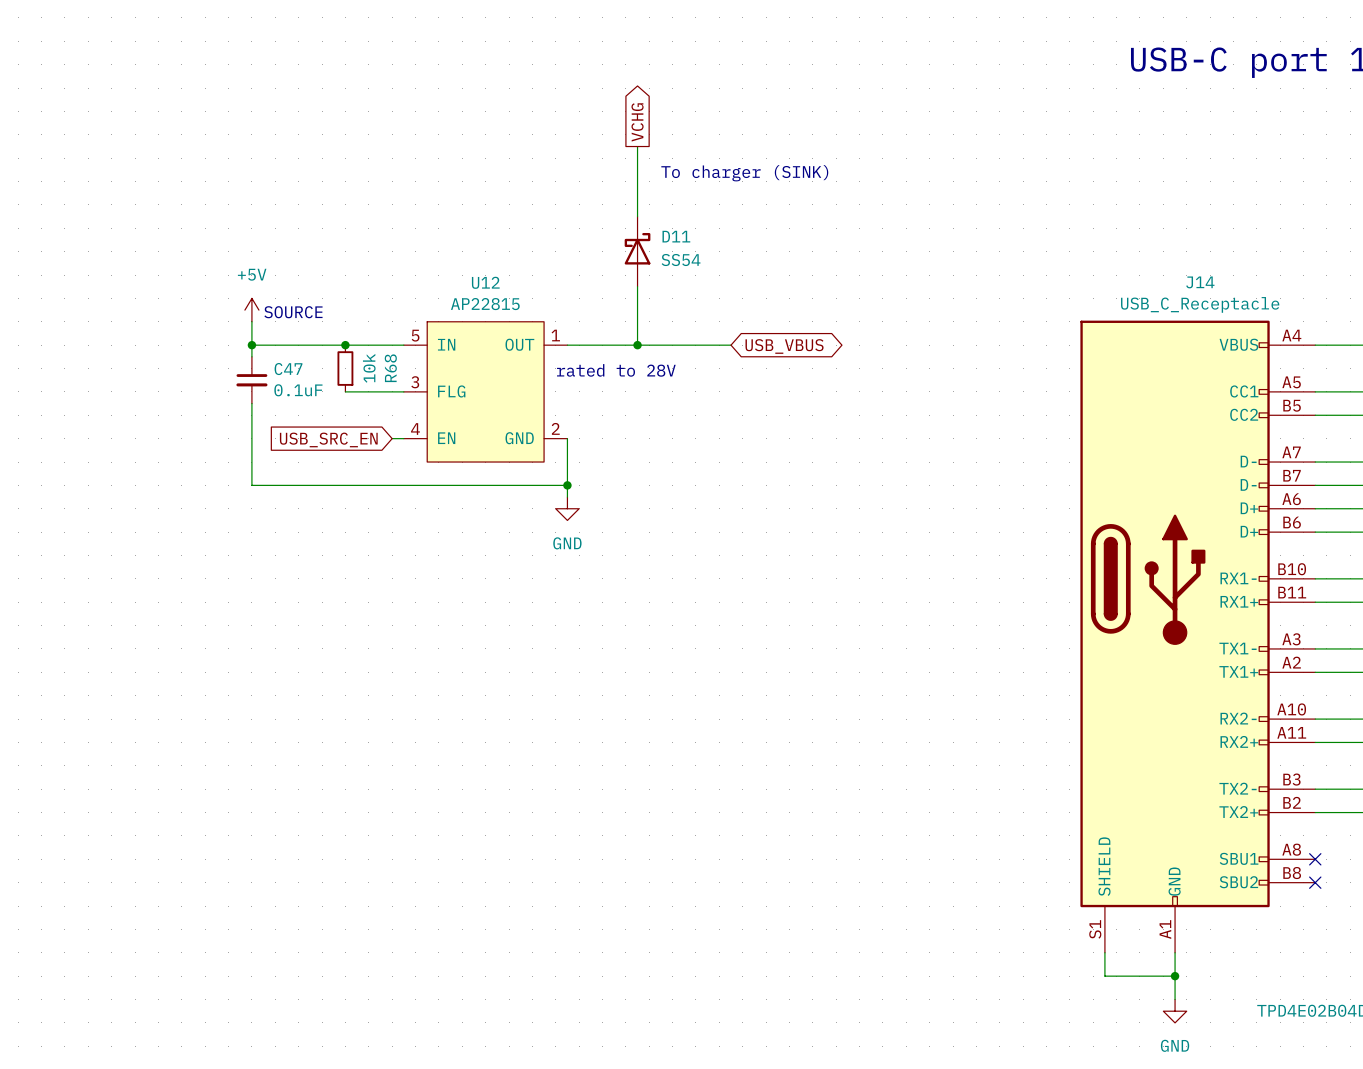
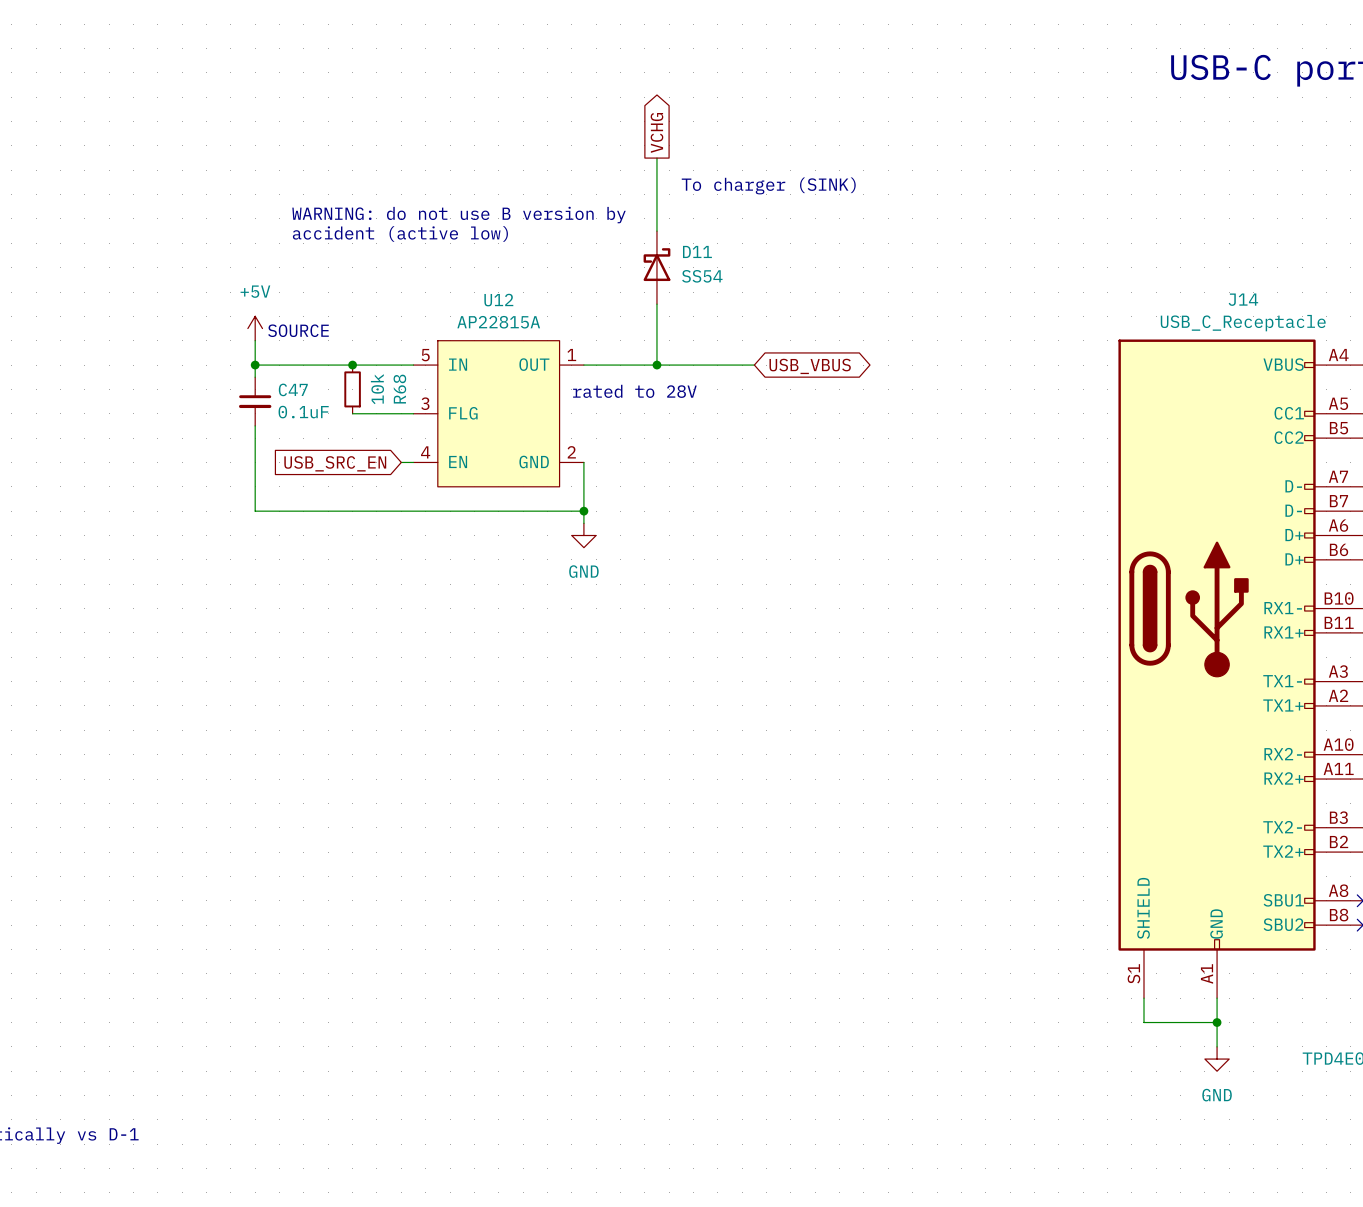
text: none -> WARNING: do not use B version by (459, 215)
text: none -> accident (active low) (400, 233)
U12 value: AP22815 (485, 304) -> AP22815A (498, 322)

